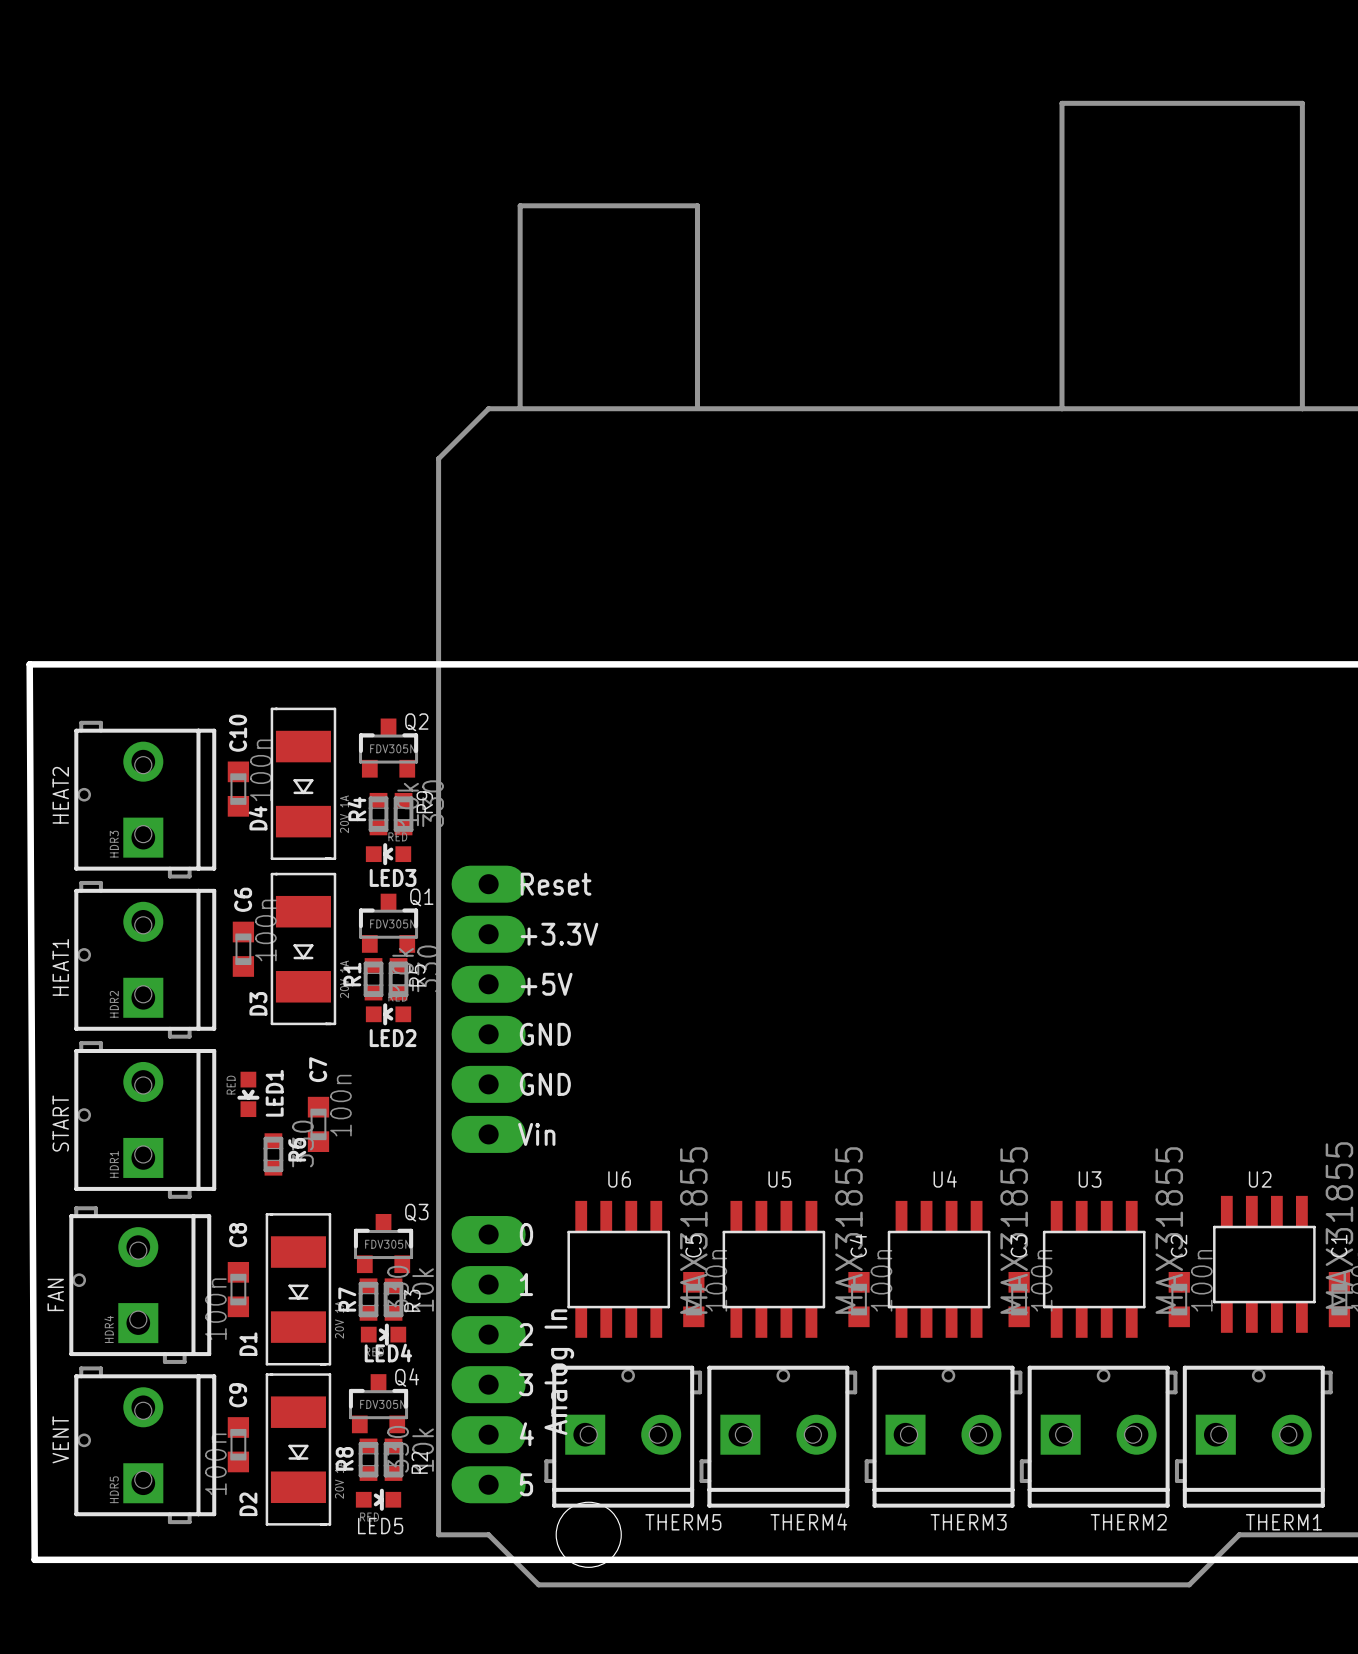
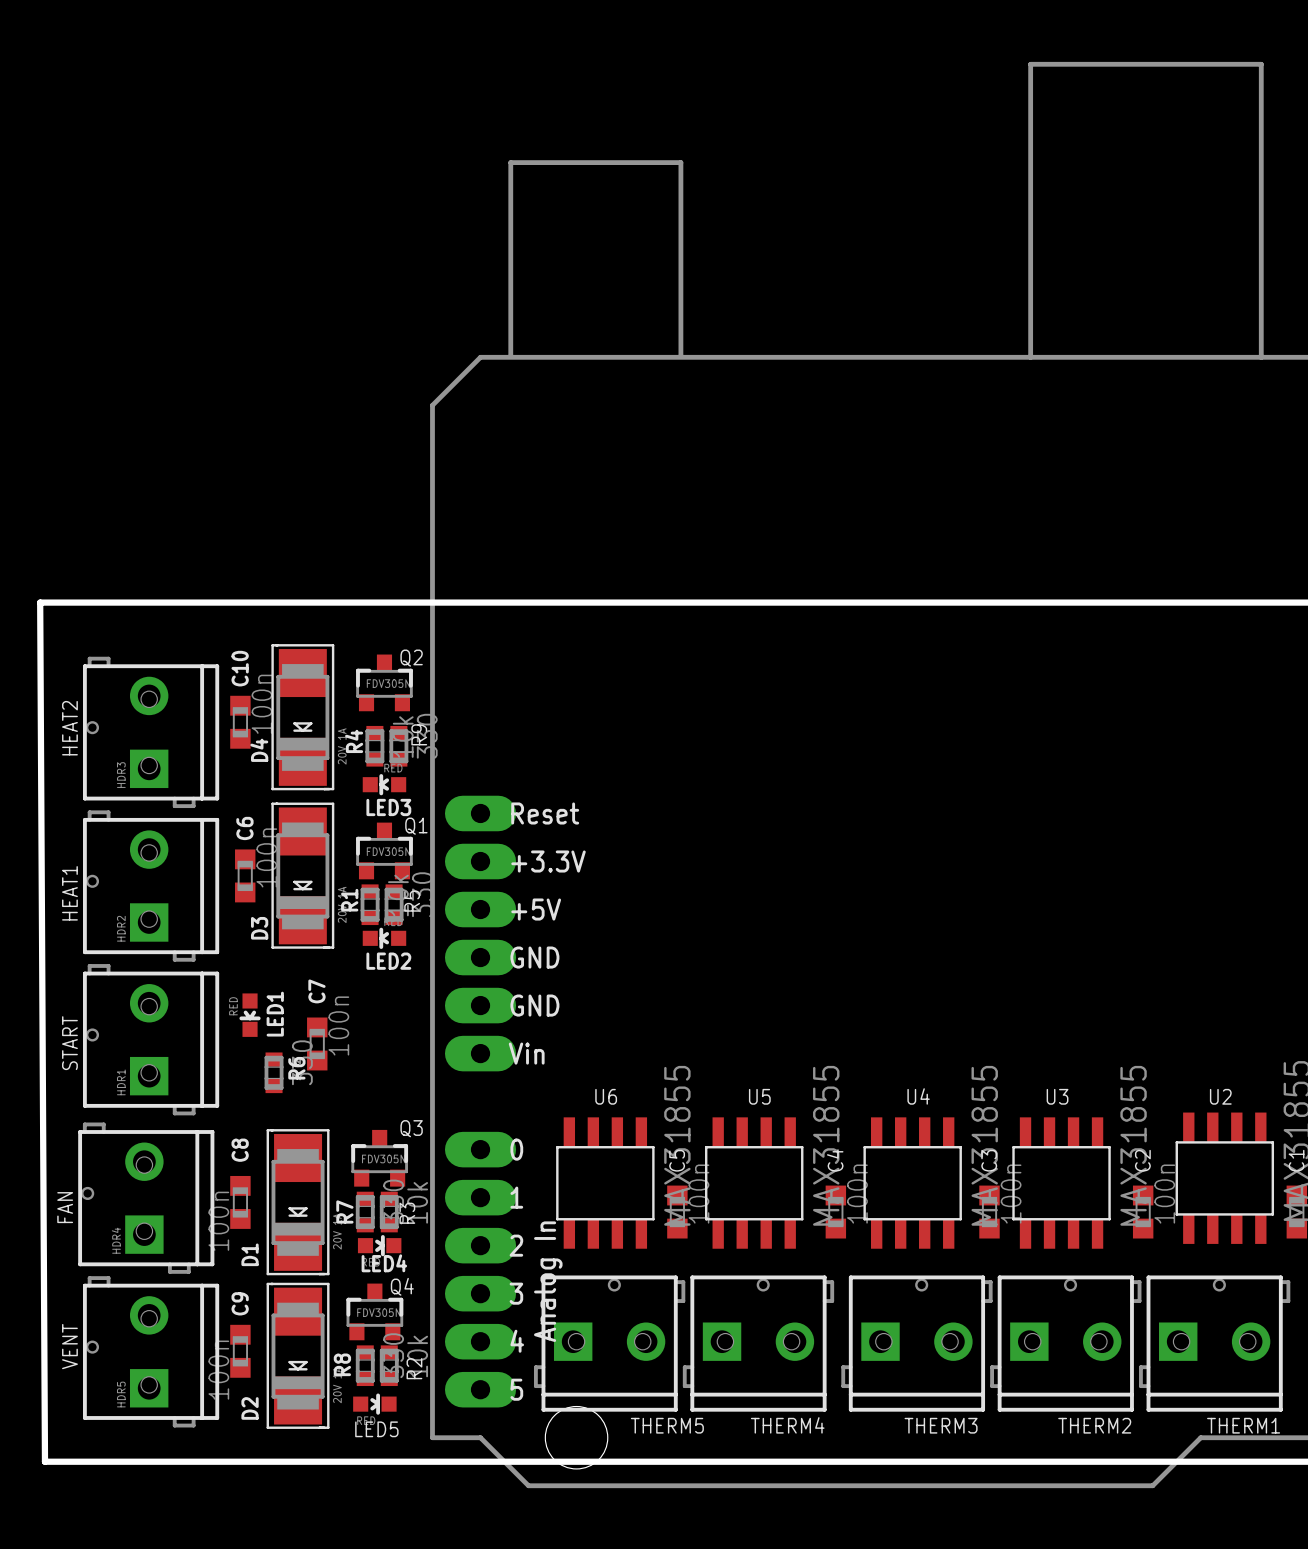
D4 footprint: [270, 707, 337, 861] -> [271, 644, 335, 791]
D3 footprint: [270, 872, 337, 1026] -> [271, 802, 335, 949]
D1 footprint: [265, 1213, 332, 1366] -> [266, 1129, 330, 1276]
D2 footprint: [265, 1373, 332, 1526] -> [266, 1282, 330, 1429]

